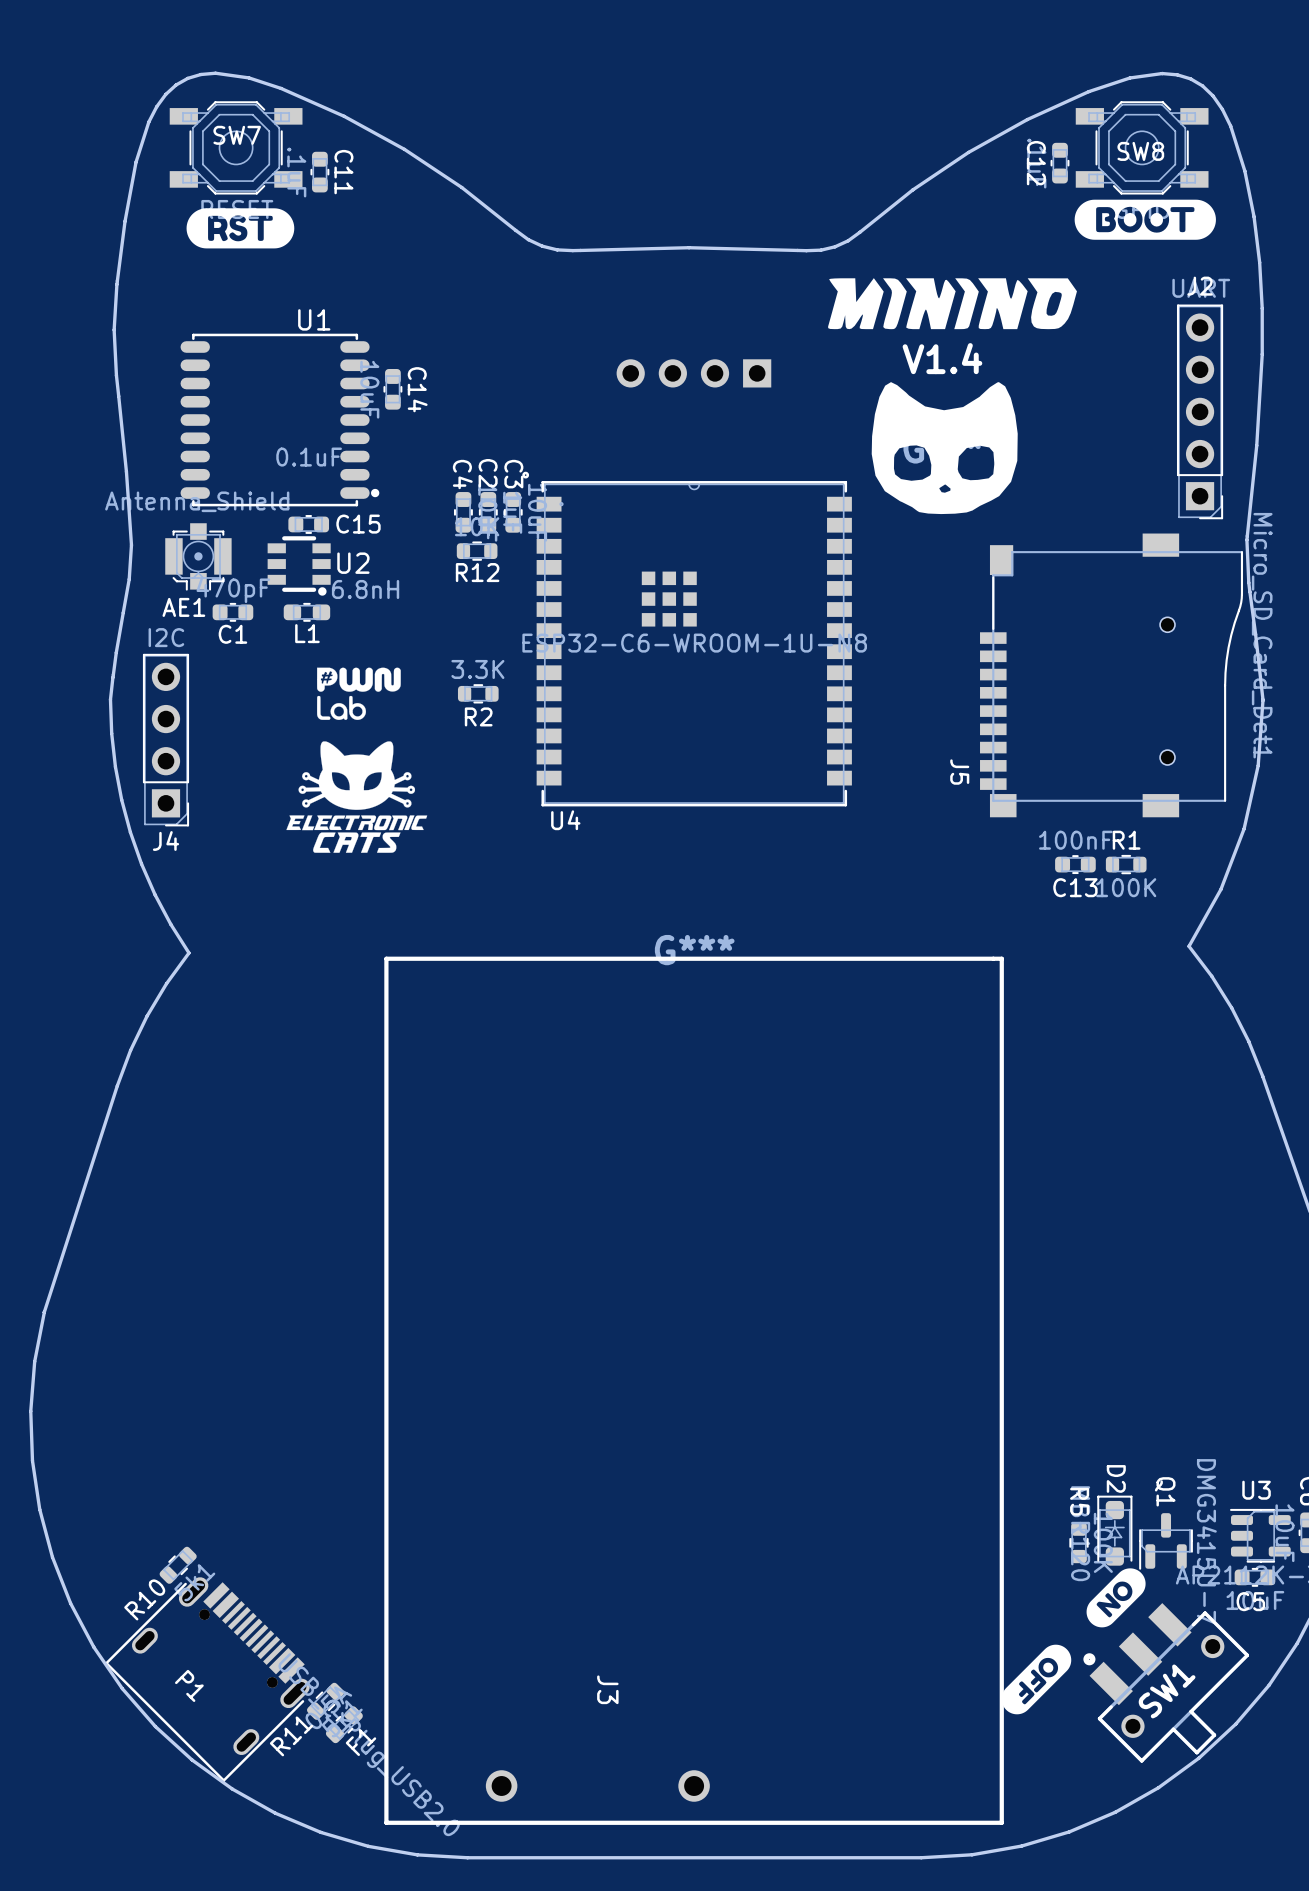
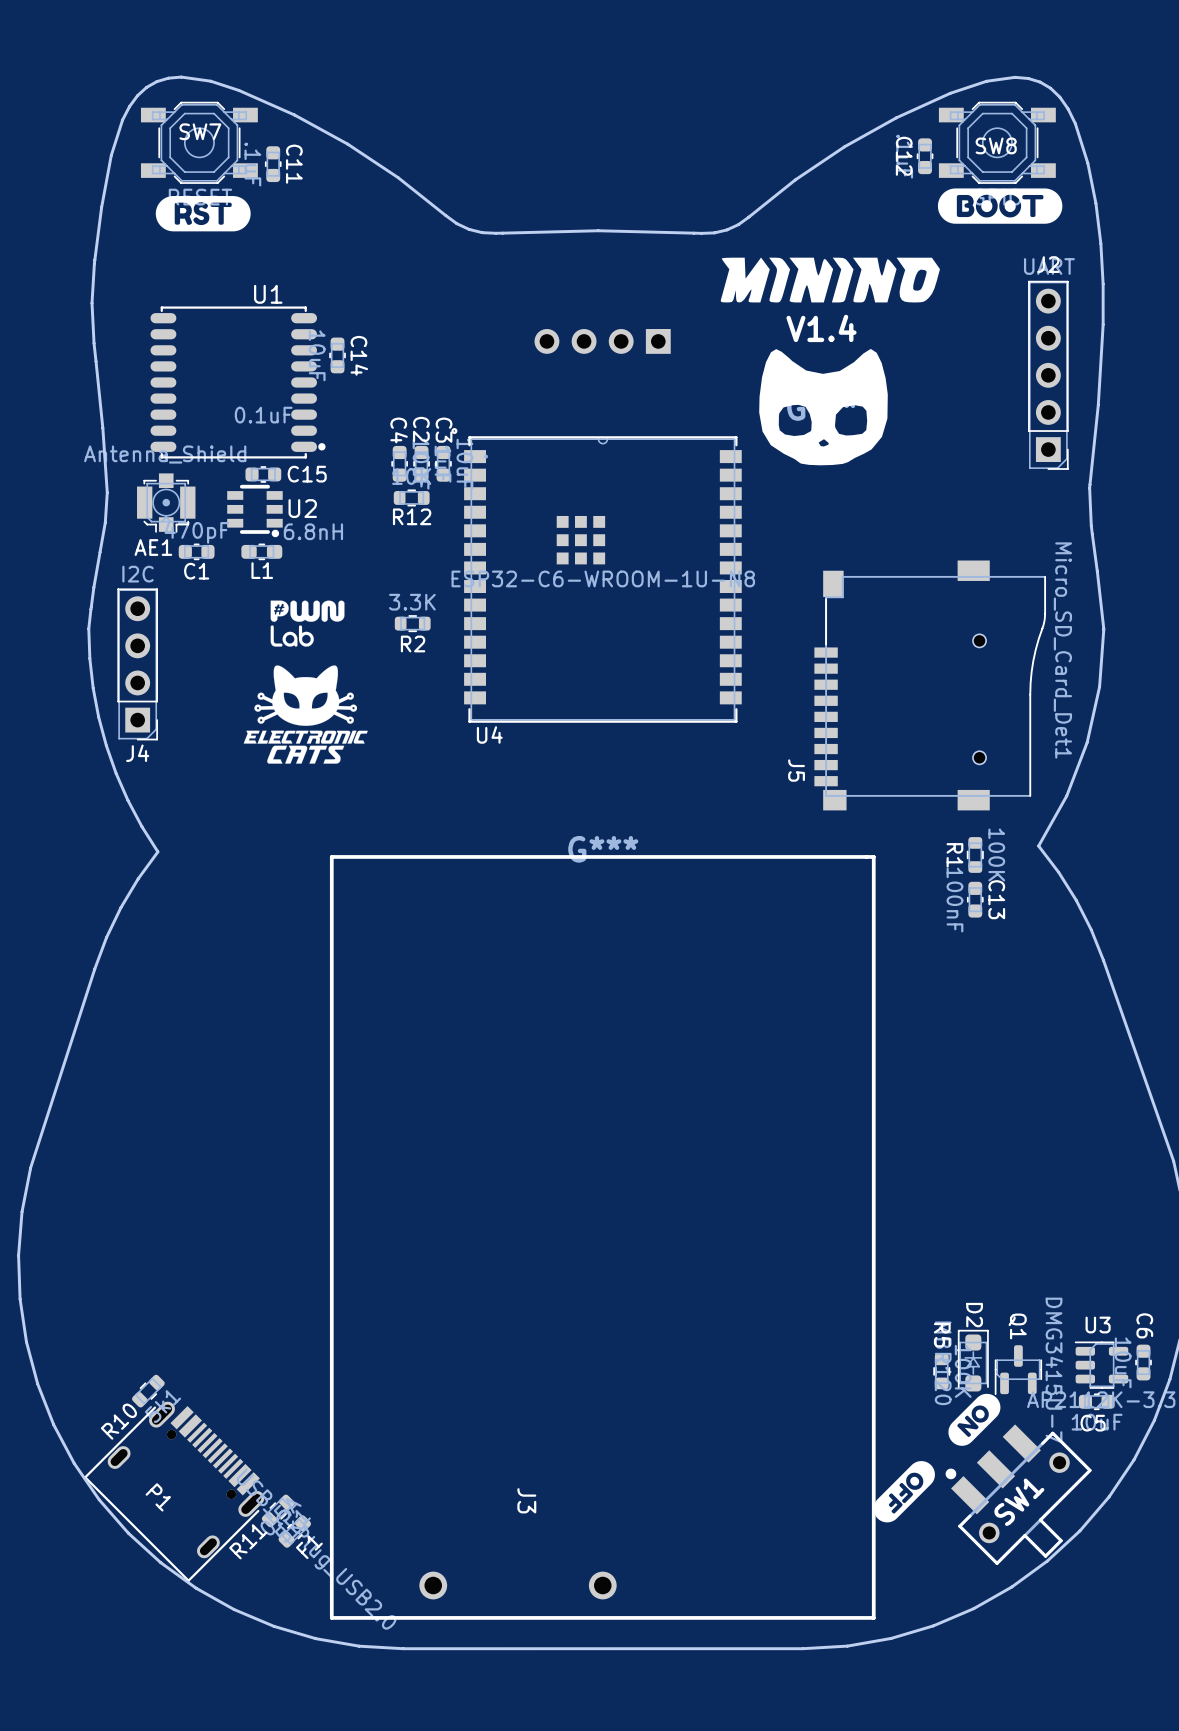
J5 position: (1111, 675) -> (930, 685)
C13 value position: 100nF (1075, 840) -> 100nF (954, 900)
R1 name position: R1 (1126, 840) -> R1 (954, 855)
C13 rotation: 0° (1075, 864) -> 90° clockwise (975, 899)
C13 position: (1075, 864) -> (975, 899)
R1 rotation: 0° (1126, 864) -> 90° clockwise (975, 854)
R1 position: (1126, 864) -> (975, 854)
C13 name position: C13 (1075, 887) -> C13 (996, 899)
R1 value position: 100K (1126, 887) -> 100K (996, 854)

